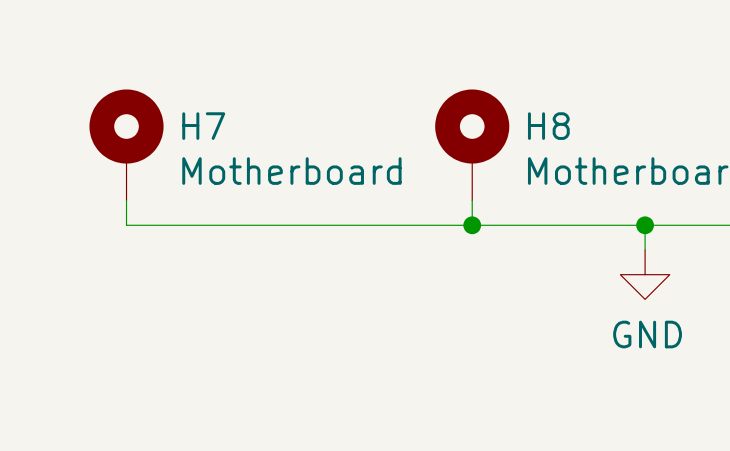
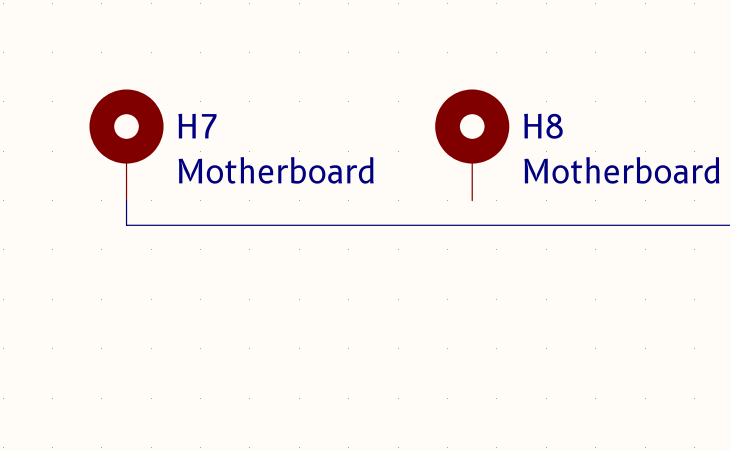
wire: (472, 200) (472, 225) -> none
junction: (472, 225) -> none
wire: (645, 225) (645, 249) -> none
junction: (645, 225) -> none
power symbol: GND (645, 274) -> none

